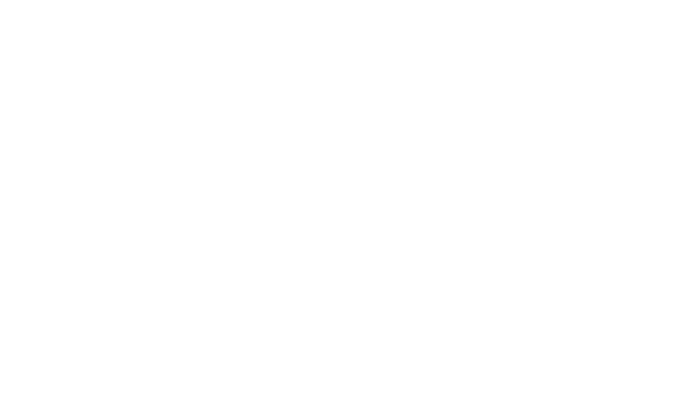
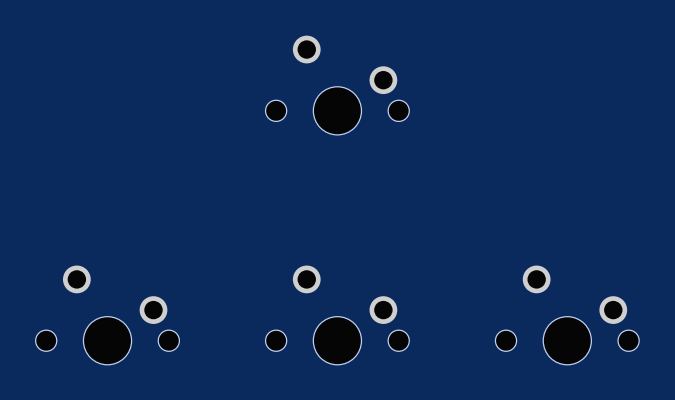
part: none -> (337, 85)
part: none -> (107, 315)
part: none -> (337, 315)
part: none -> (567, 315)

